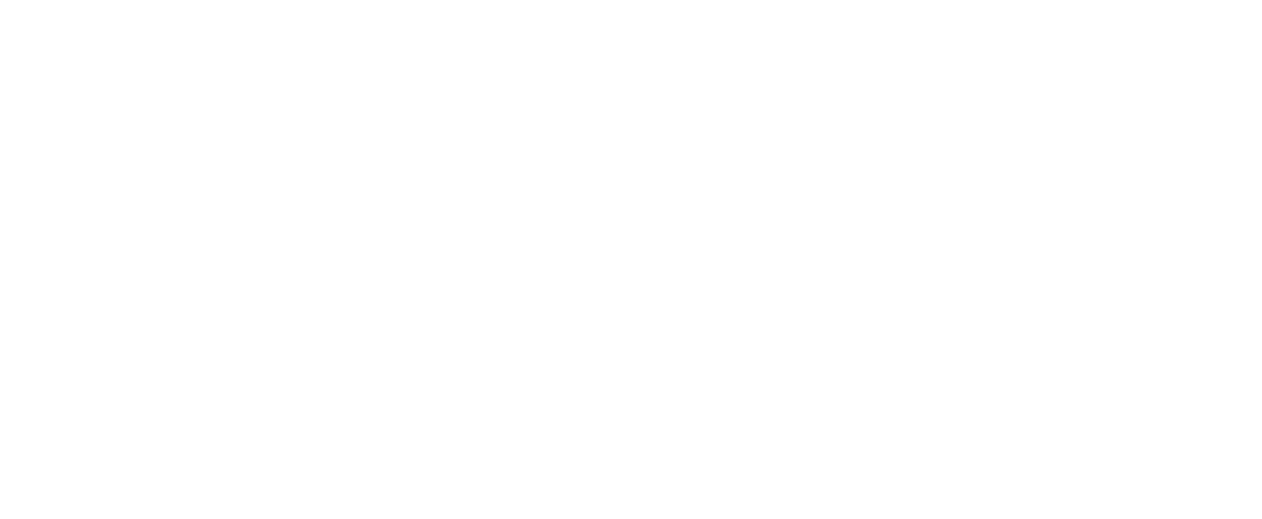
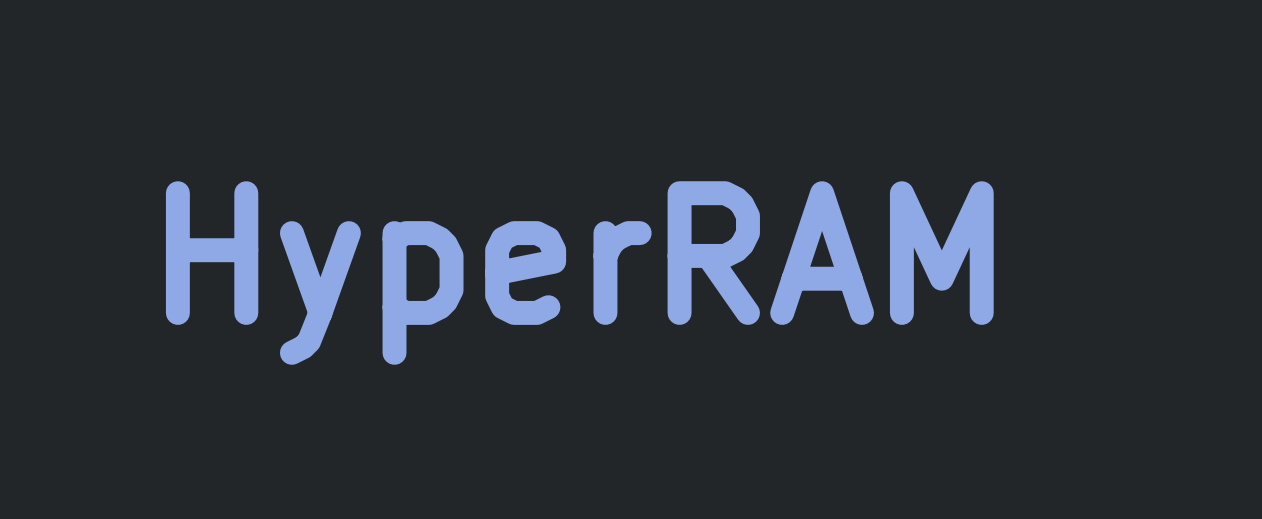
text: none -> HyperRAM (579, 273)

